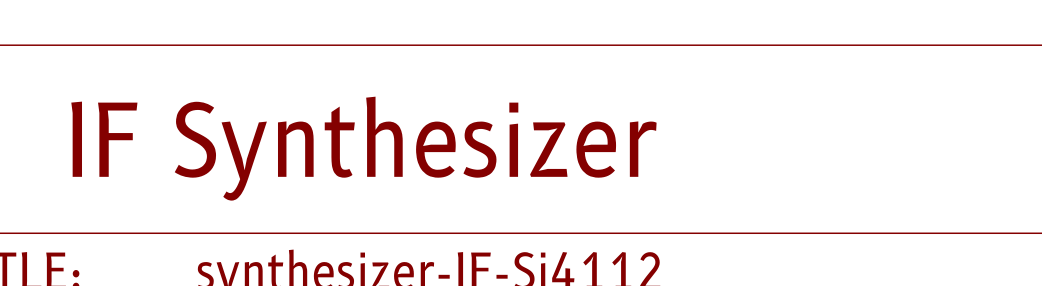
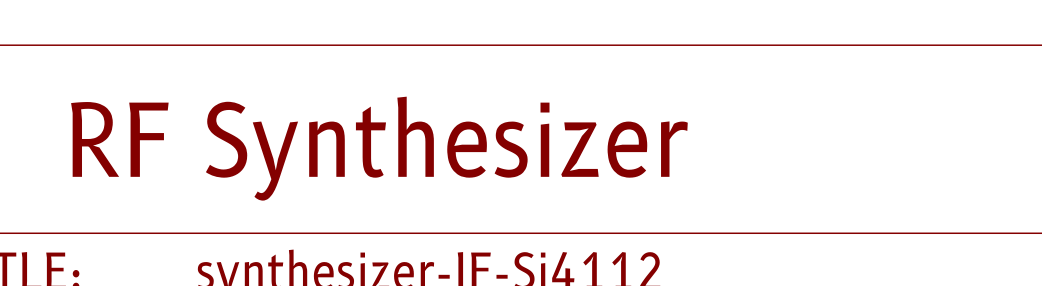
text: IF Synthesizer (363, 148) -> RF Synthesizer (379, 148)

